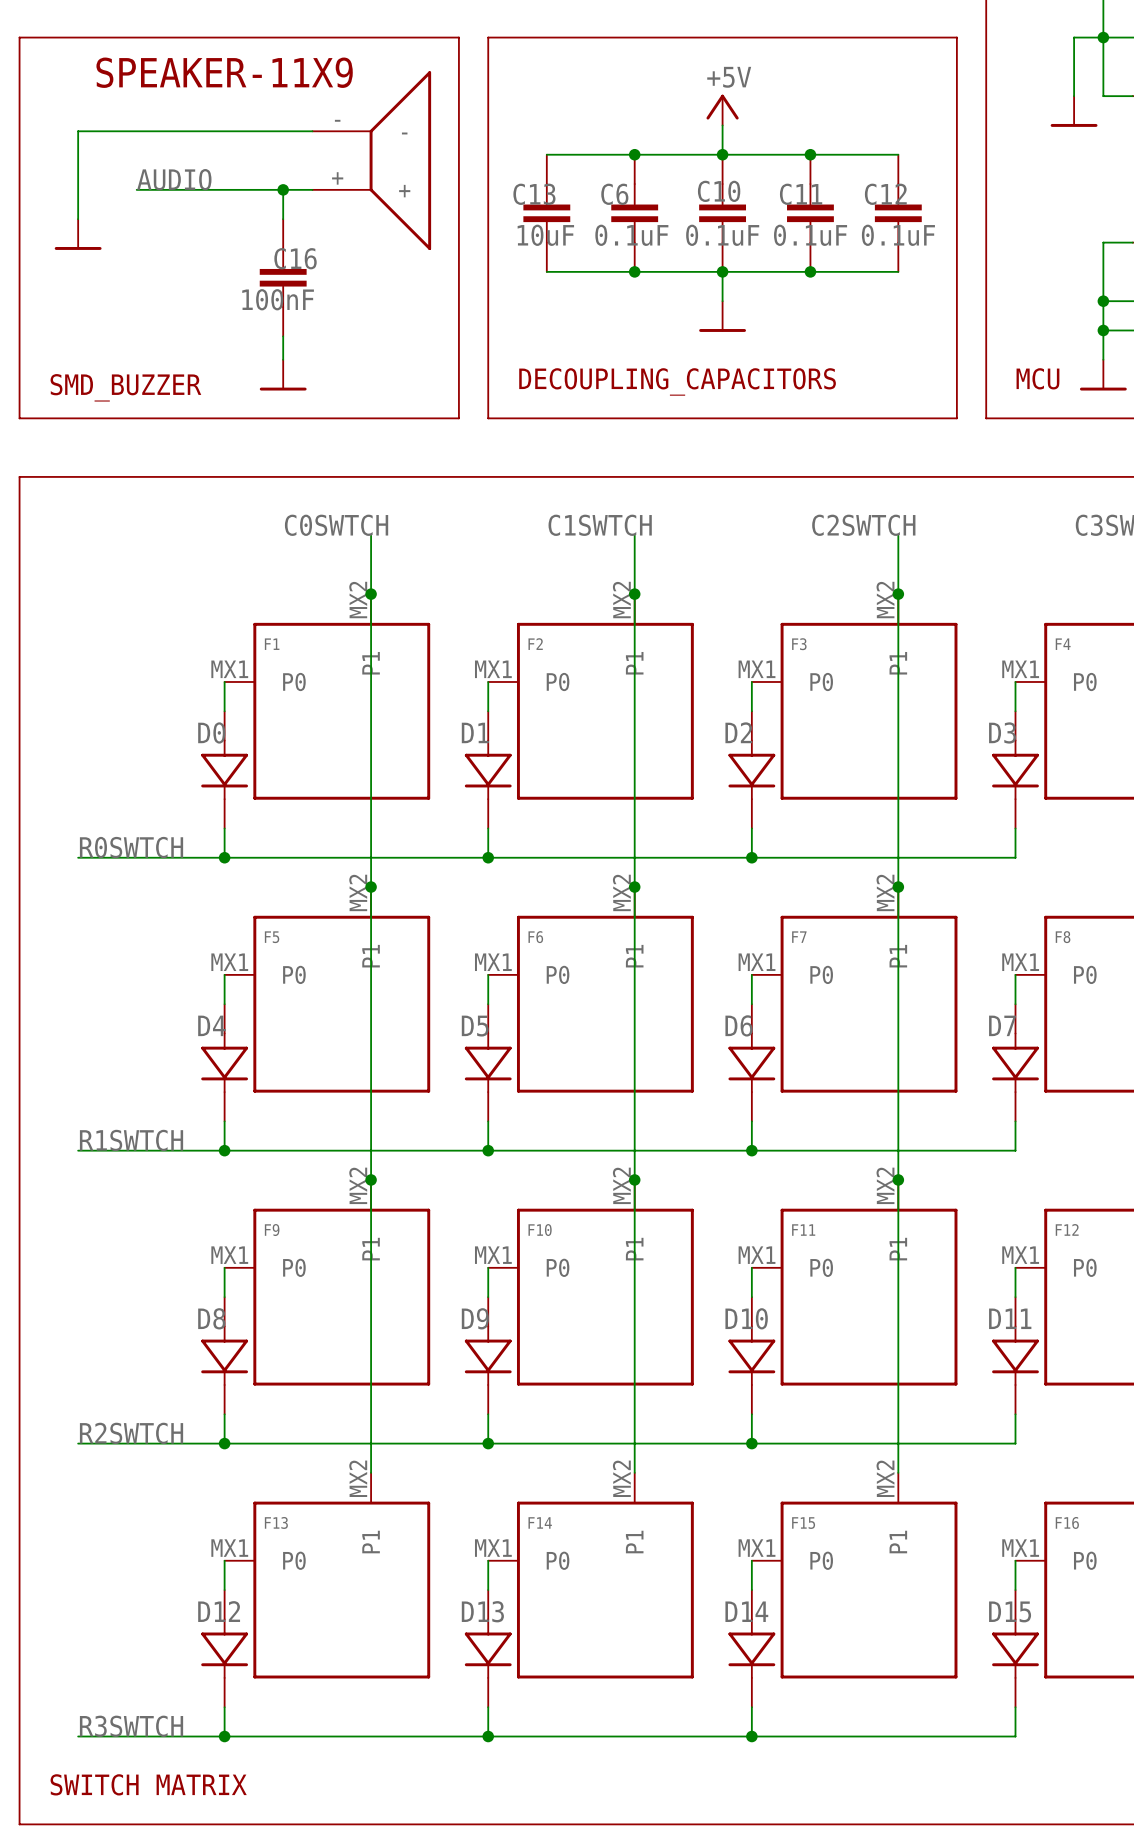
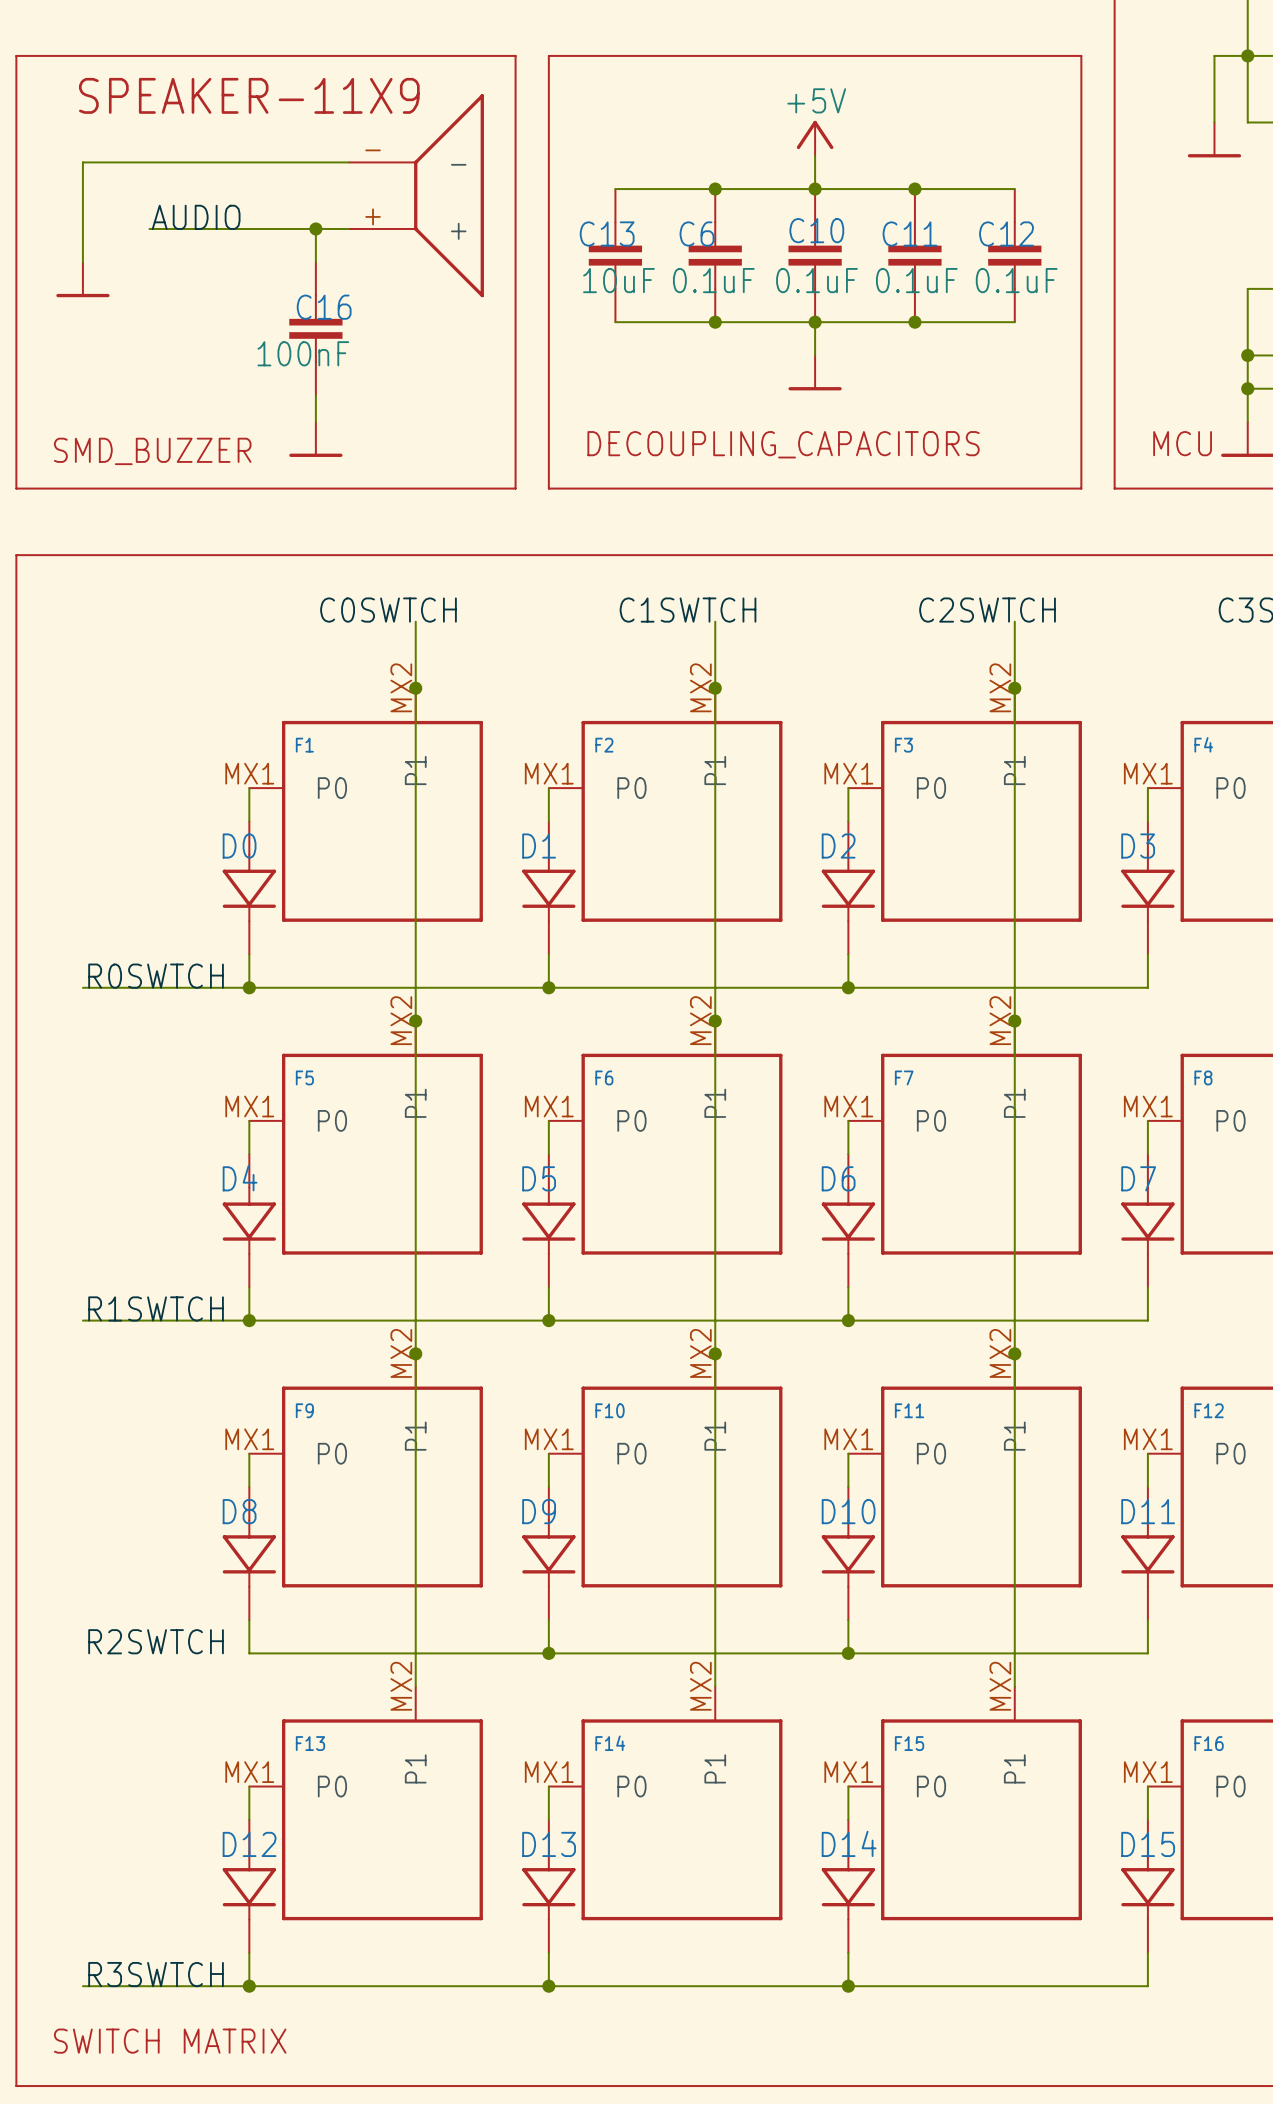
wire: (78, 1443) (224, 1443) -> none
junction: (224, 1443) -> none

